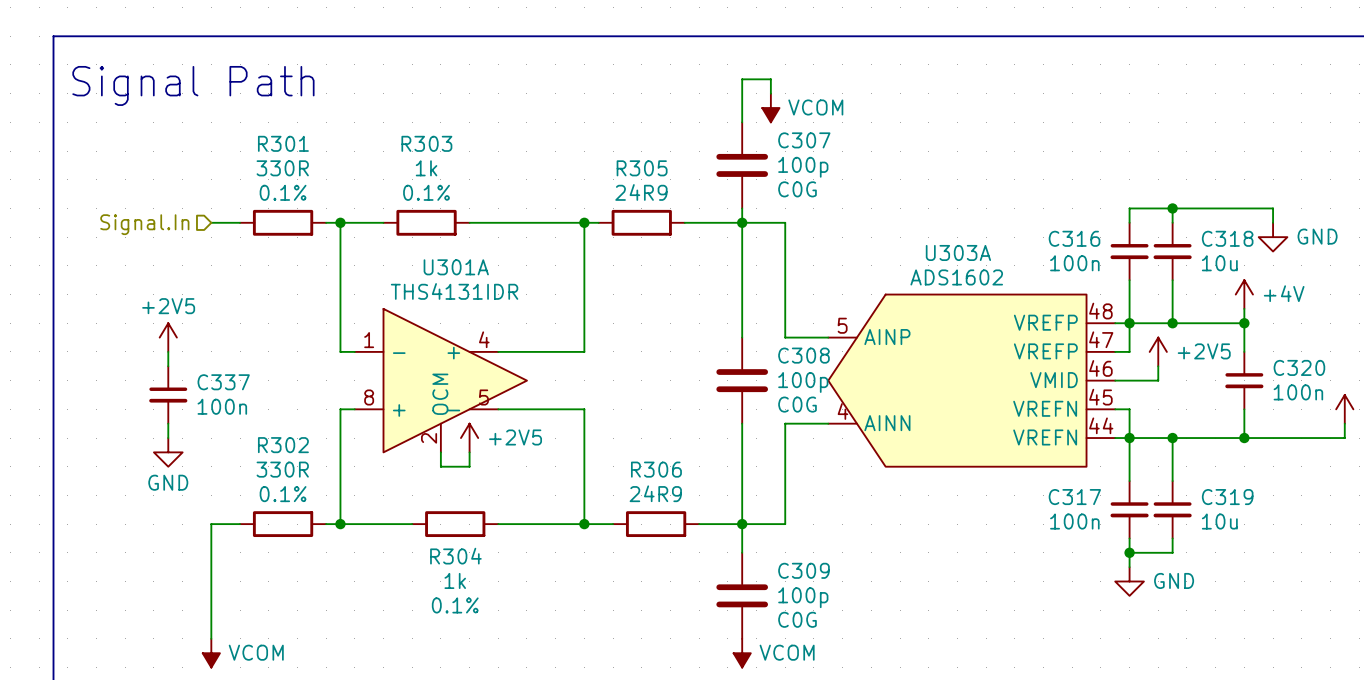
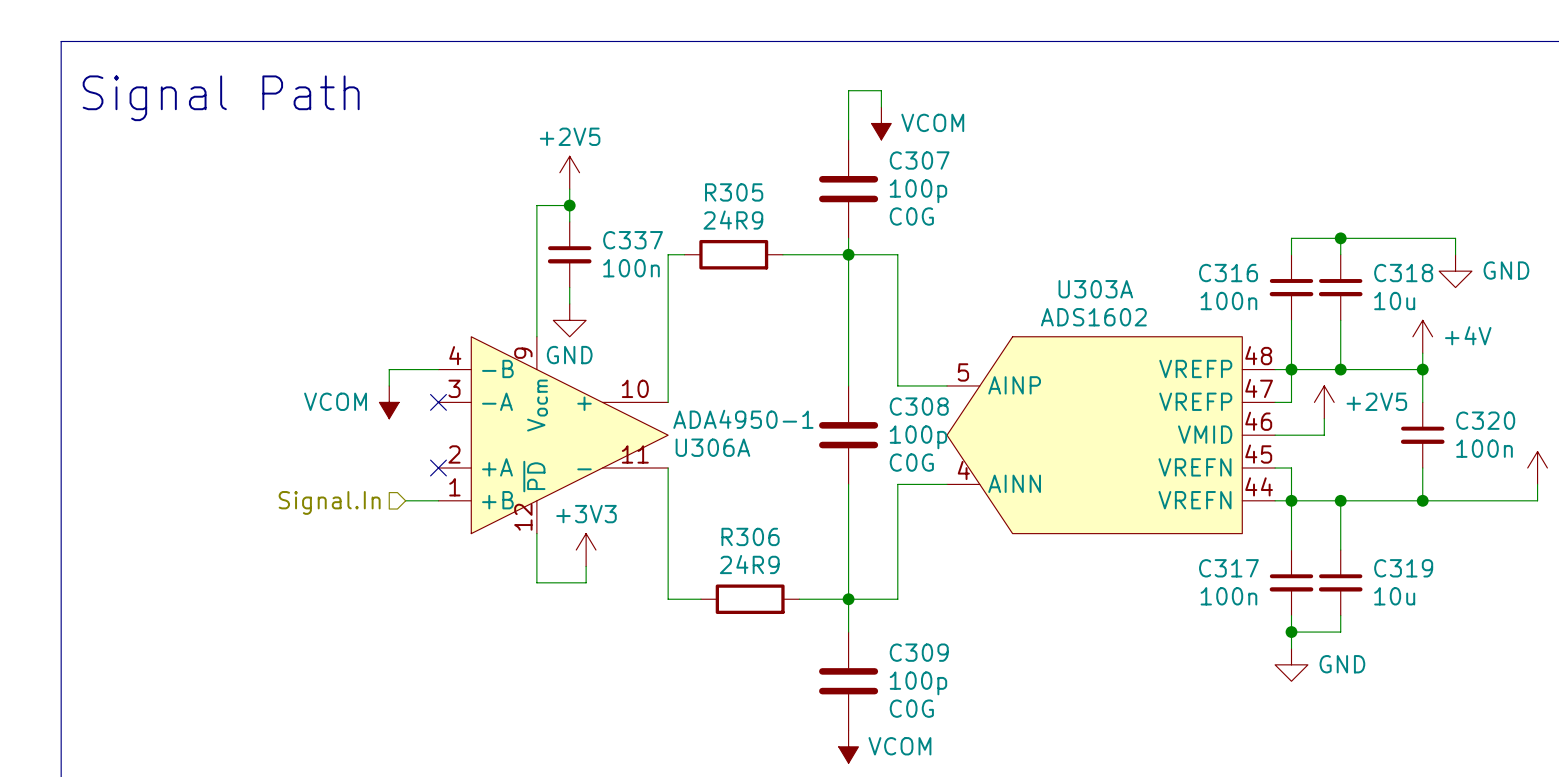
power symbol: none -> +2V5 (569, 172)
wire: none -> (569, 189) (569, 221)
wire: none -> (569, 205) (536, 205) (536, 336)
junction: none -> (569, 205)
wire: (211, 222) (240, 222) -> (405, 500) (438, 500)
R301: 330R (283, 222) -> none
wire: (326, 222) (383, 222) -> none
wire: (340, 222) (340, 323) -> (438, 369) (389, 369)
junction: (340, 222) -> none
R303: 1k (426, 222) -> none
wire: (469, 222) (584, 222) -> none
junction: (584, 222) -> none
hierarchical label position: Signal.In (144, 224) -> Signal.In (329, 502)
wire: none -> (569, 287) (569, 303)
power symbol: none -> GND (569, 320)
power symbol: +2V5 (168, 337) -> none
wire: (168, 351) (168, 366) -> none
power symbol: none -> VCOM (389, 402)
no-connect mark: none -> (438, 402)
U301A: THS4131IDR (440, 380) -> none
U306A: none -> ADA4950-1 (553, 435)
C337 position: (168, 394) -> (569, 254)
wire: (354, 409) (340, 409) (340, 524) -> none
no-connect mark: none -> (438, 468)
wire: (168, 423) (168, 438) -> none
power symbol: +2V5 (469, 438) -> none
power symbol: GND (168, 452) -> none
wire: (440, 452) (440, 466) (469, 466) (469, 452) -> none
wire: none -> (536, 533) (536, 582) (586, 582) (586, 566)
power symbol: none -> +3V3 (586, 550)
wire: (240, 524) (211, 524) (211, 638) -> none
R302: 330R (283, 524) -> none
wire: (326, 524) (412, 524) -> none
junction: (340, 524) -> none
R304: 1k (455, 524) -> none
wire: (498, 524) (584, 524) -> none
junction: (584, 524) -> none
power symbol: VCOM (211, 653) -> none

